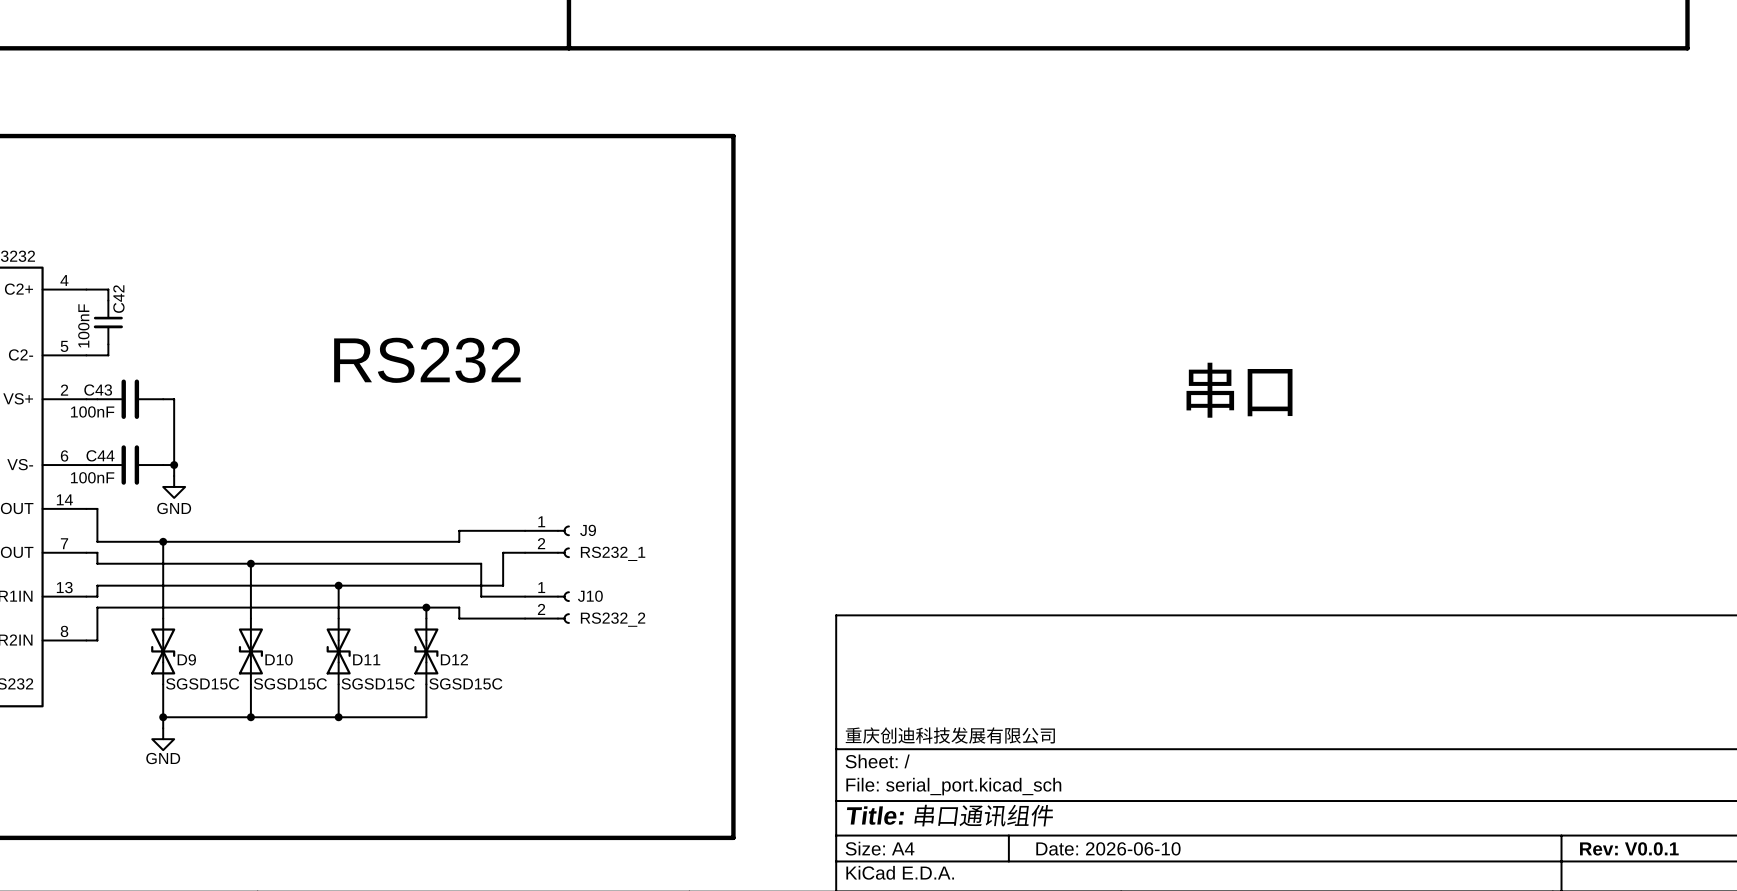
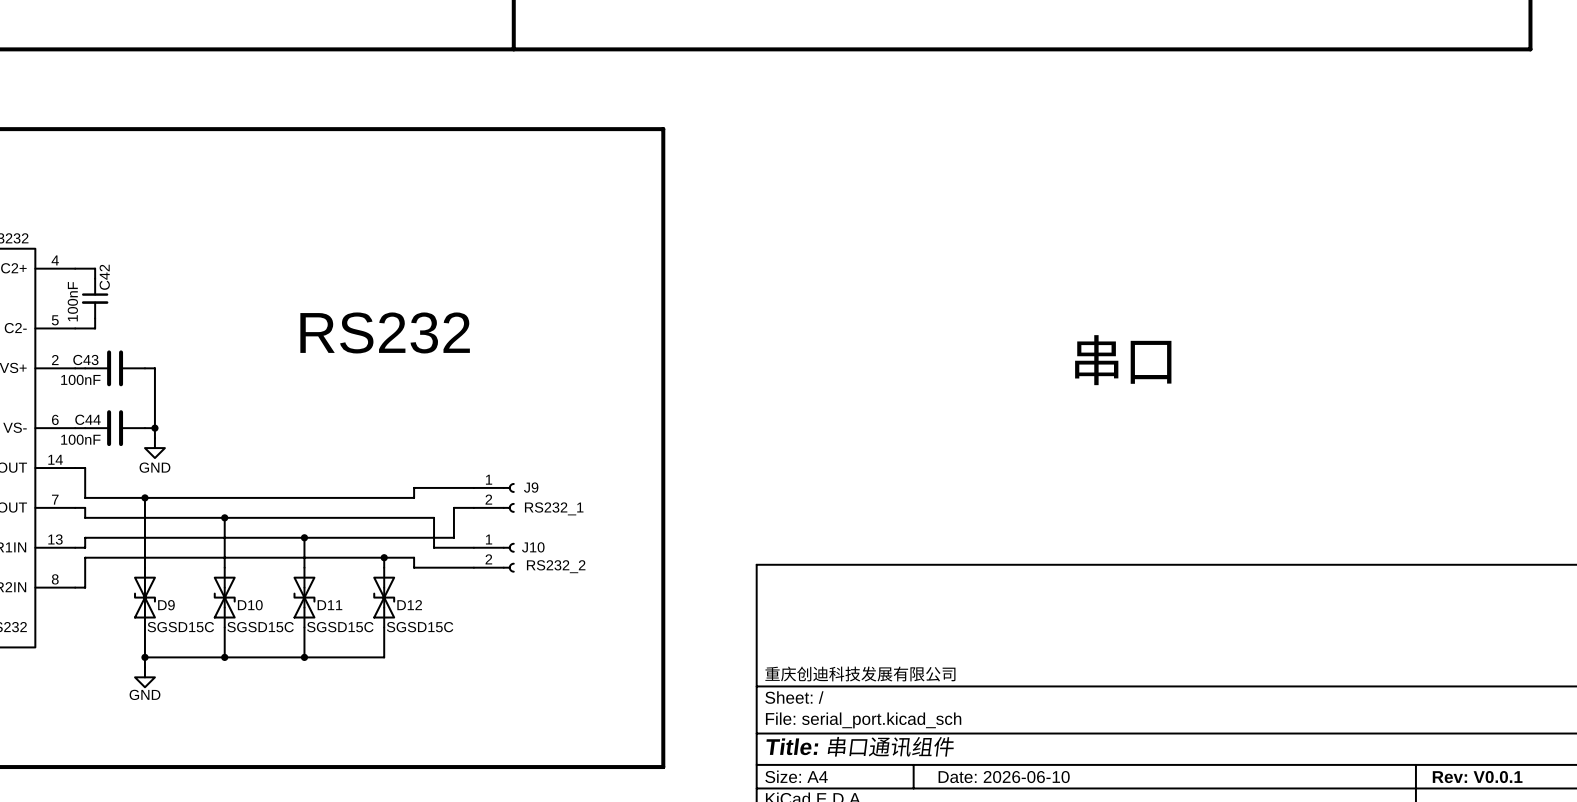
J9 text: RS232_1 (613, 553) -> none
J9 value: none -> RS232_1 (554, 508)
J10 value: none -> RS232_2 (556, 566)
J10 text: RS232_2 (613, 619) -> none

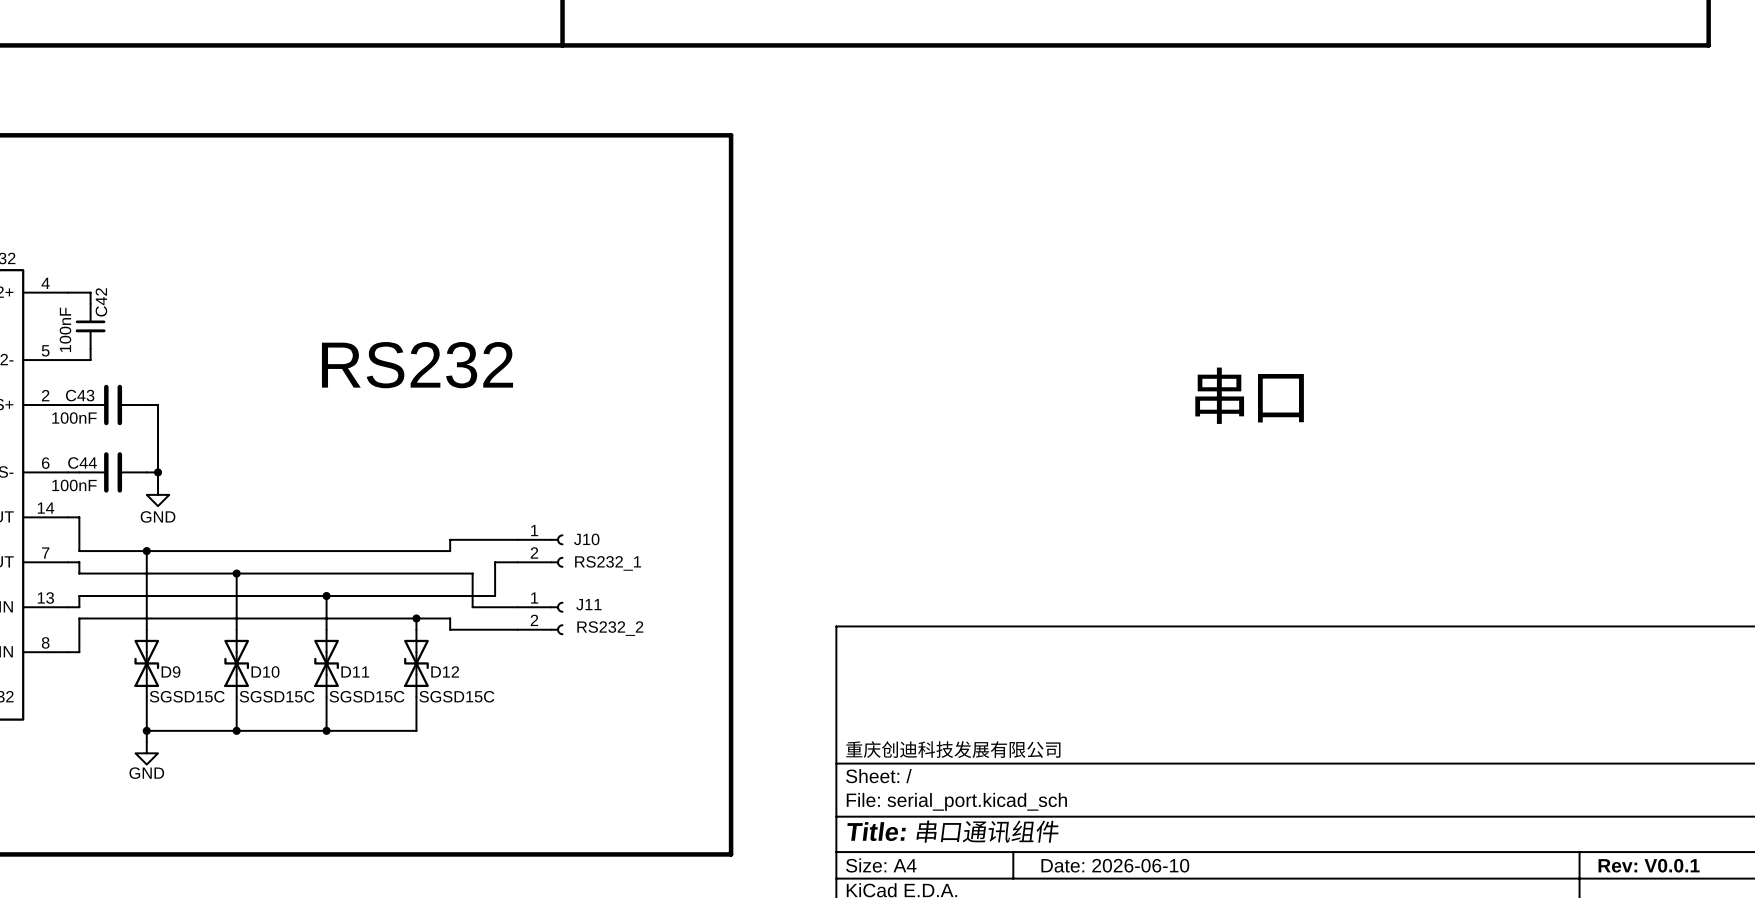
J9 name: J9 (531, 487) -> J10 (586, 539)
J10 name: J10 (533, 547) -> J11 (588, 604)

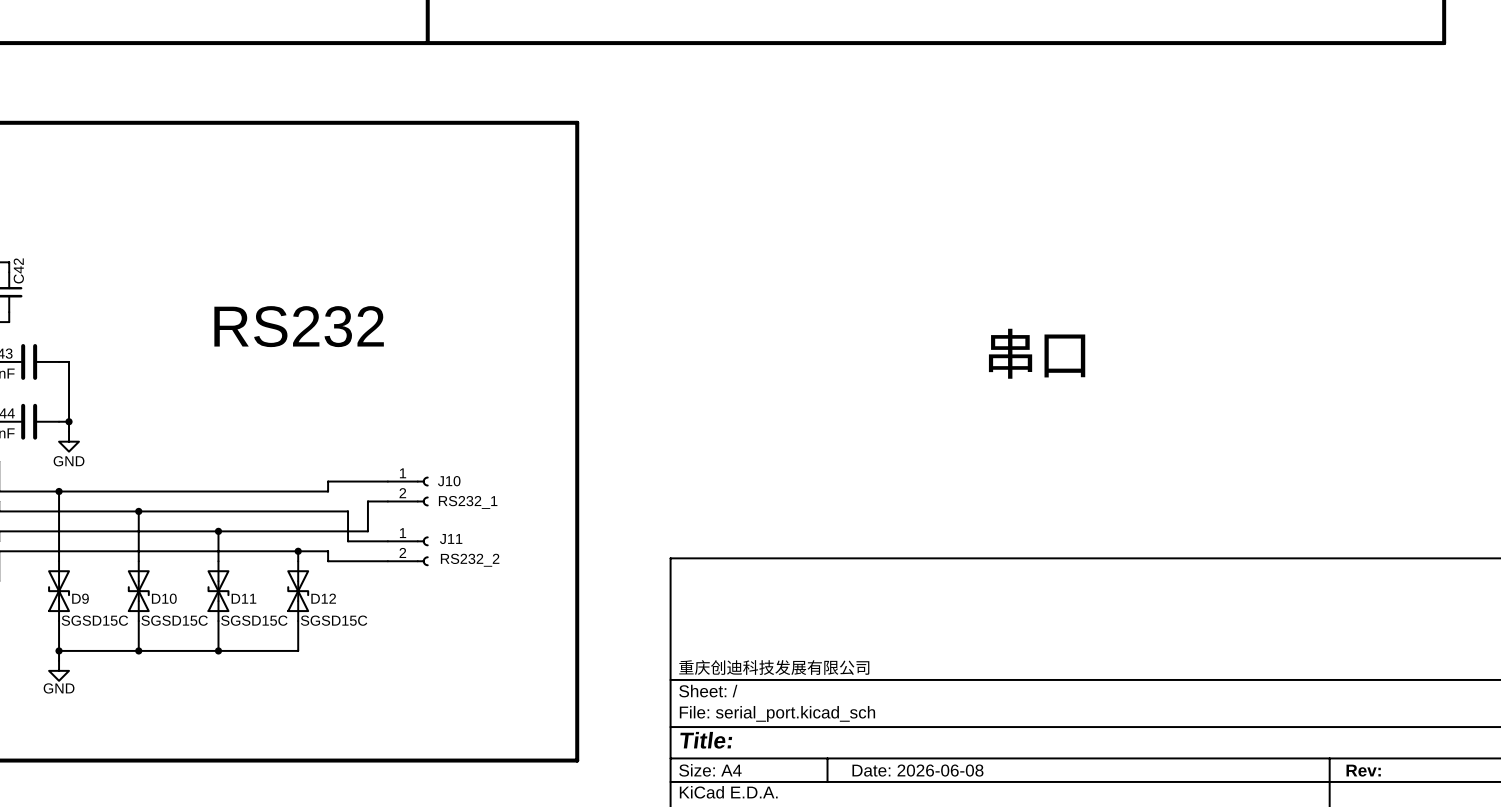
title block: Title: 串口通讯组件 (952, 831) -> Title: (706, 740)
title block: Date: 2026-06-10 (1115, 865) -> Date: 2026-06-08 (917, 770)
title block: Rev: V0.0.1 (1649, 865) -> Rev: (1363, 770)

